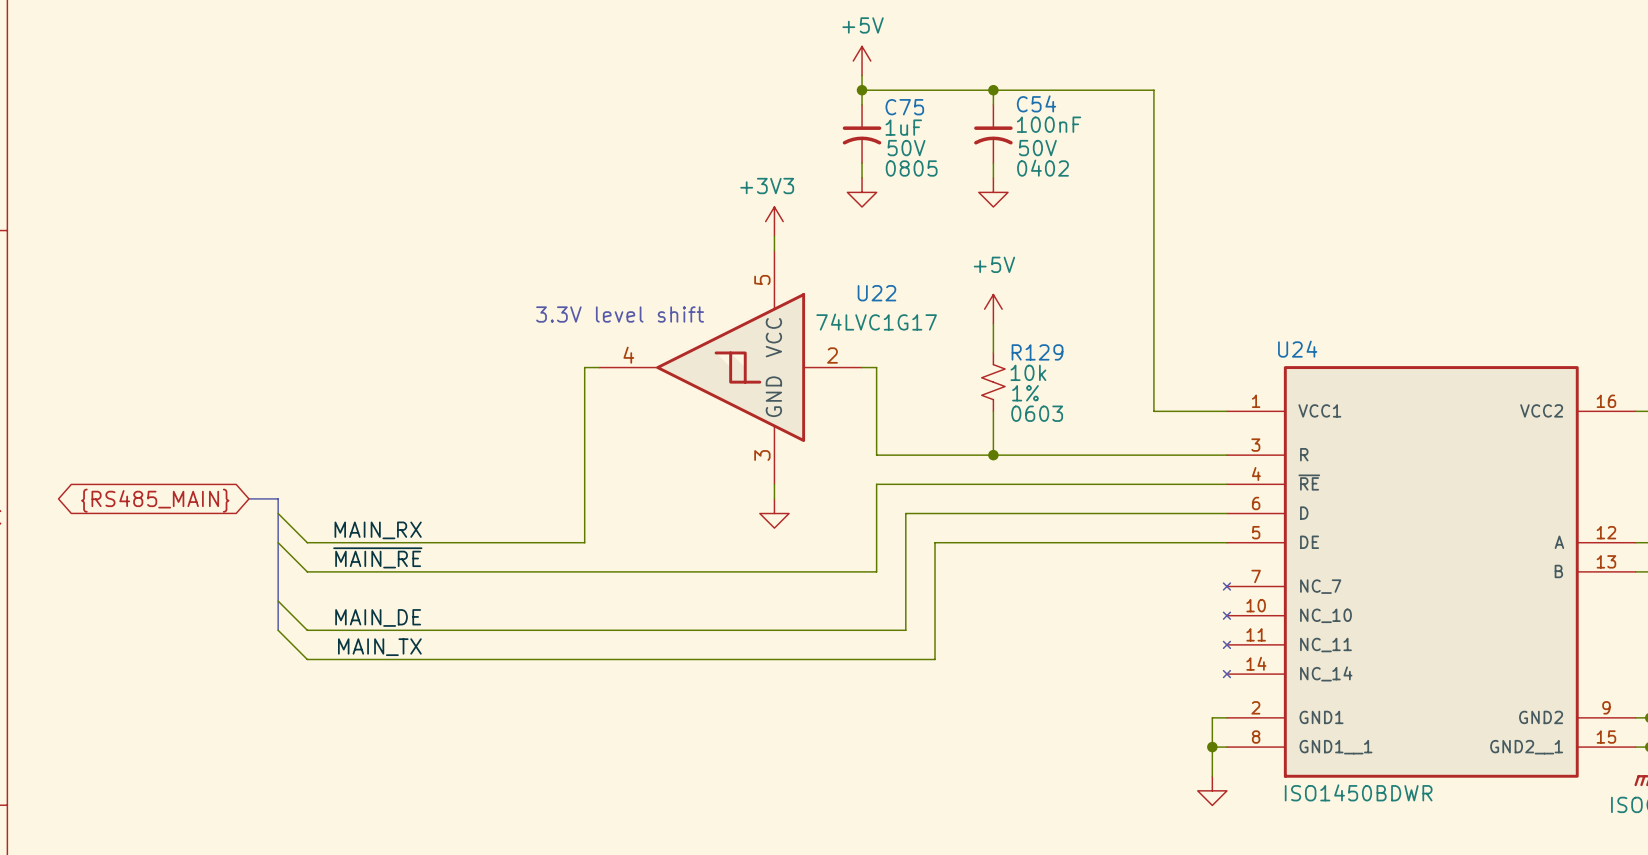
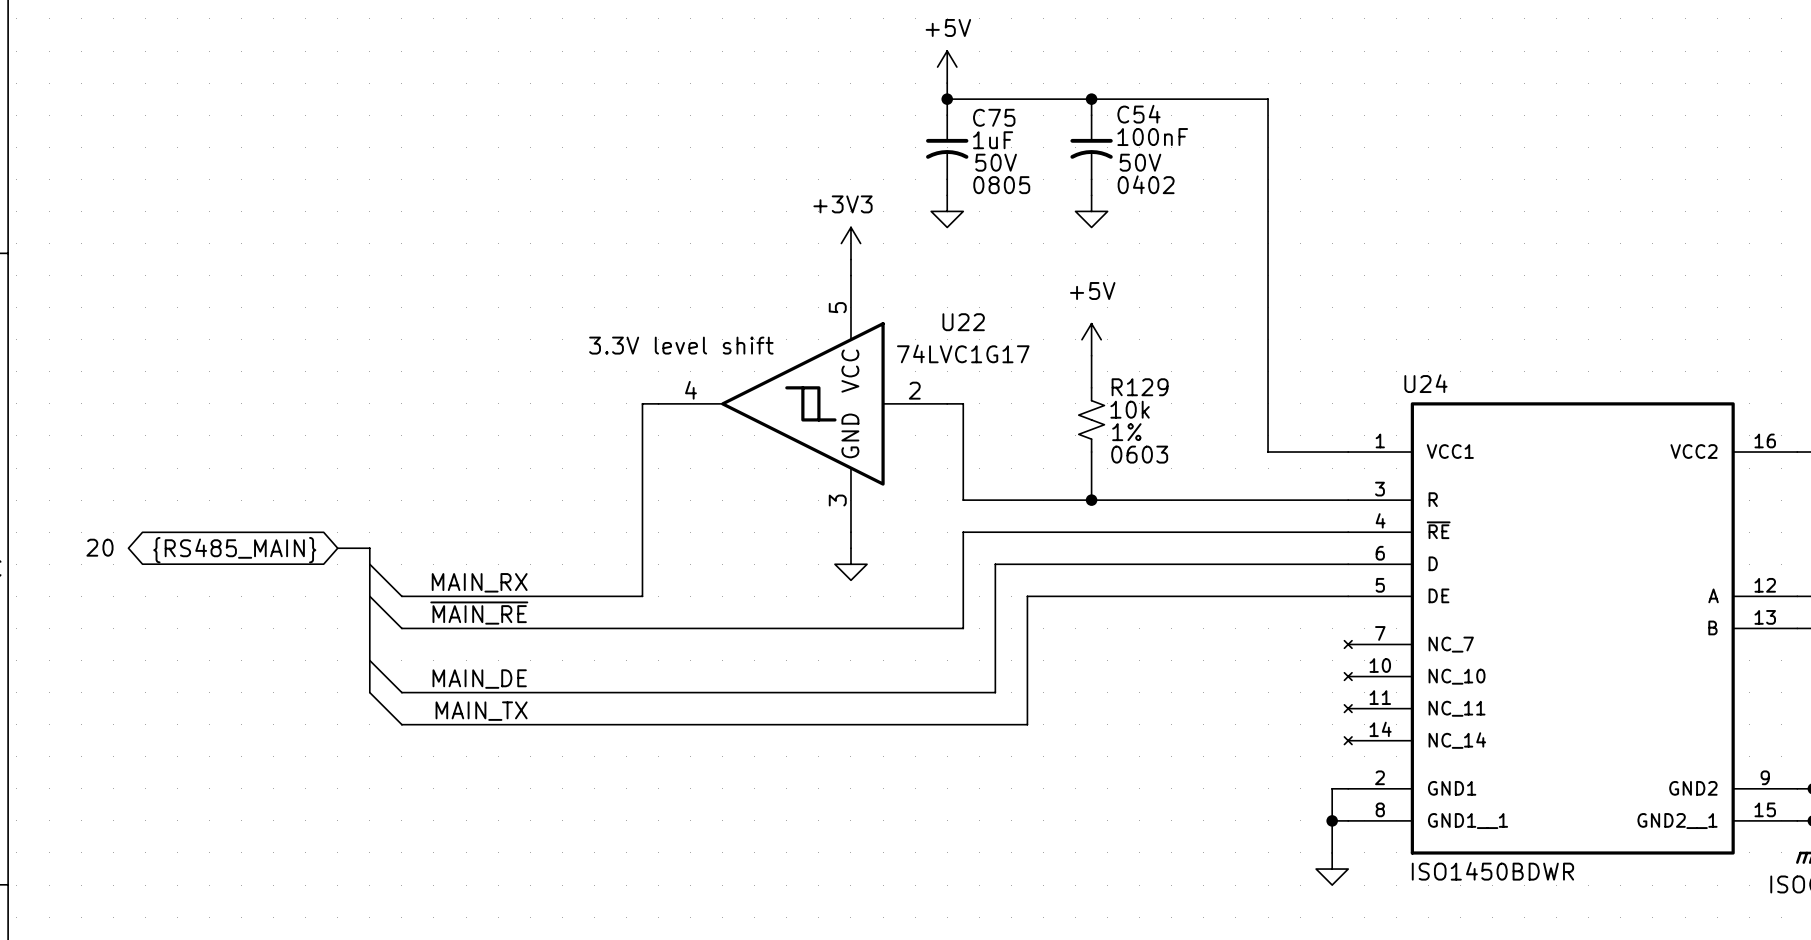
text: none -> 20 (99, 547)
bus: (248, 498) (278, 498) (278, 630) -> (337, 548) (369, 548) (369, 692)
global label position: {RS485_MAIN} (155, 500) -> {RS485_MAIN} (234, 550)
wire: (278, 513) (307, 542) (365, 542) -> (369, 564) (401, 596)
label position: MAIN_RX (378, 530) -> MAIN_RX (479, 582)
wire: (278, 542) (307, 571) (365, 571) -> (369, 596) (401, 628)
label position: ~{MAIN_RE} (377, 557) -> ~{MAIN_RE} (479, 613)
wire: (278, 601) (307, 630) (365, 630) -> (369, 660) (401, 692)
label position: MAIN_DE (378, 617) -> MAIN_DE (479, 679)
wire: (278, 630) (307, 659) (365, 659) -> (369, 692) (401, 724)
label position: MAIN_TX (379, 647) -> MAIN_TX (481, 711)

